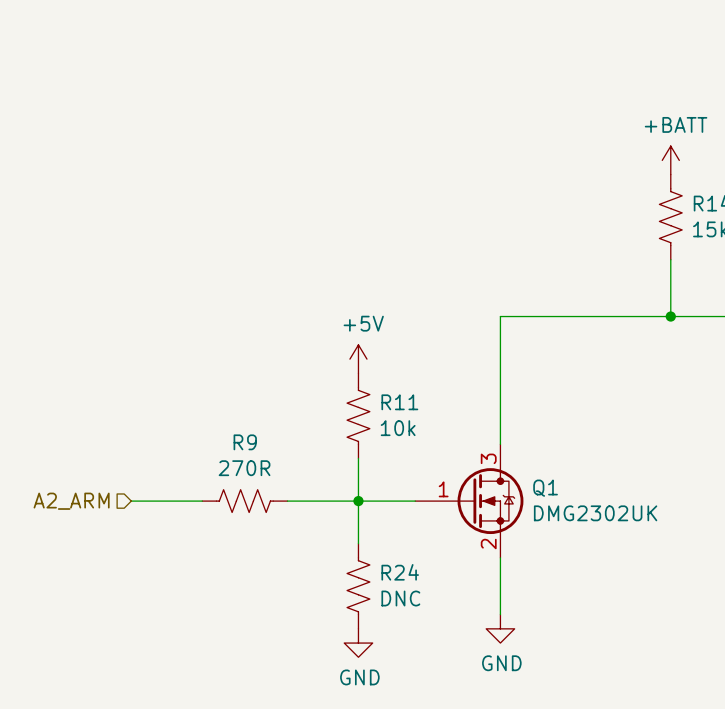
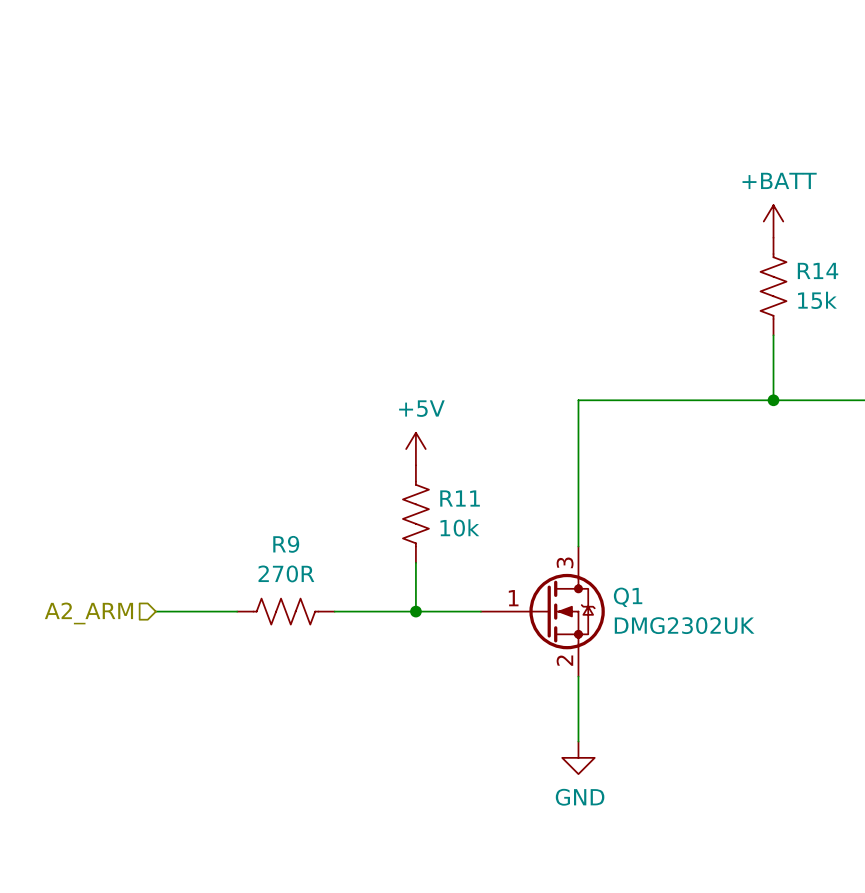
wire: (358, 501) (358, 543) -> none
R24: DNC (358, 586) -> none
power symbol: GND (358, 643) -> none

